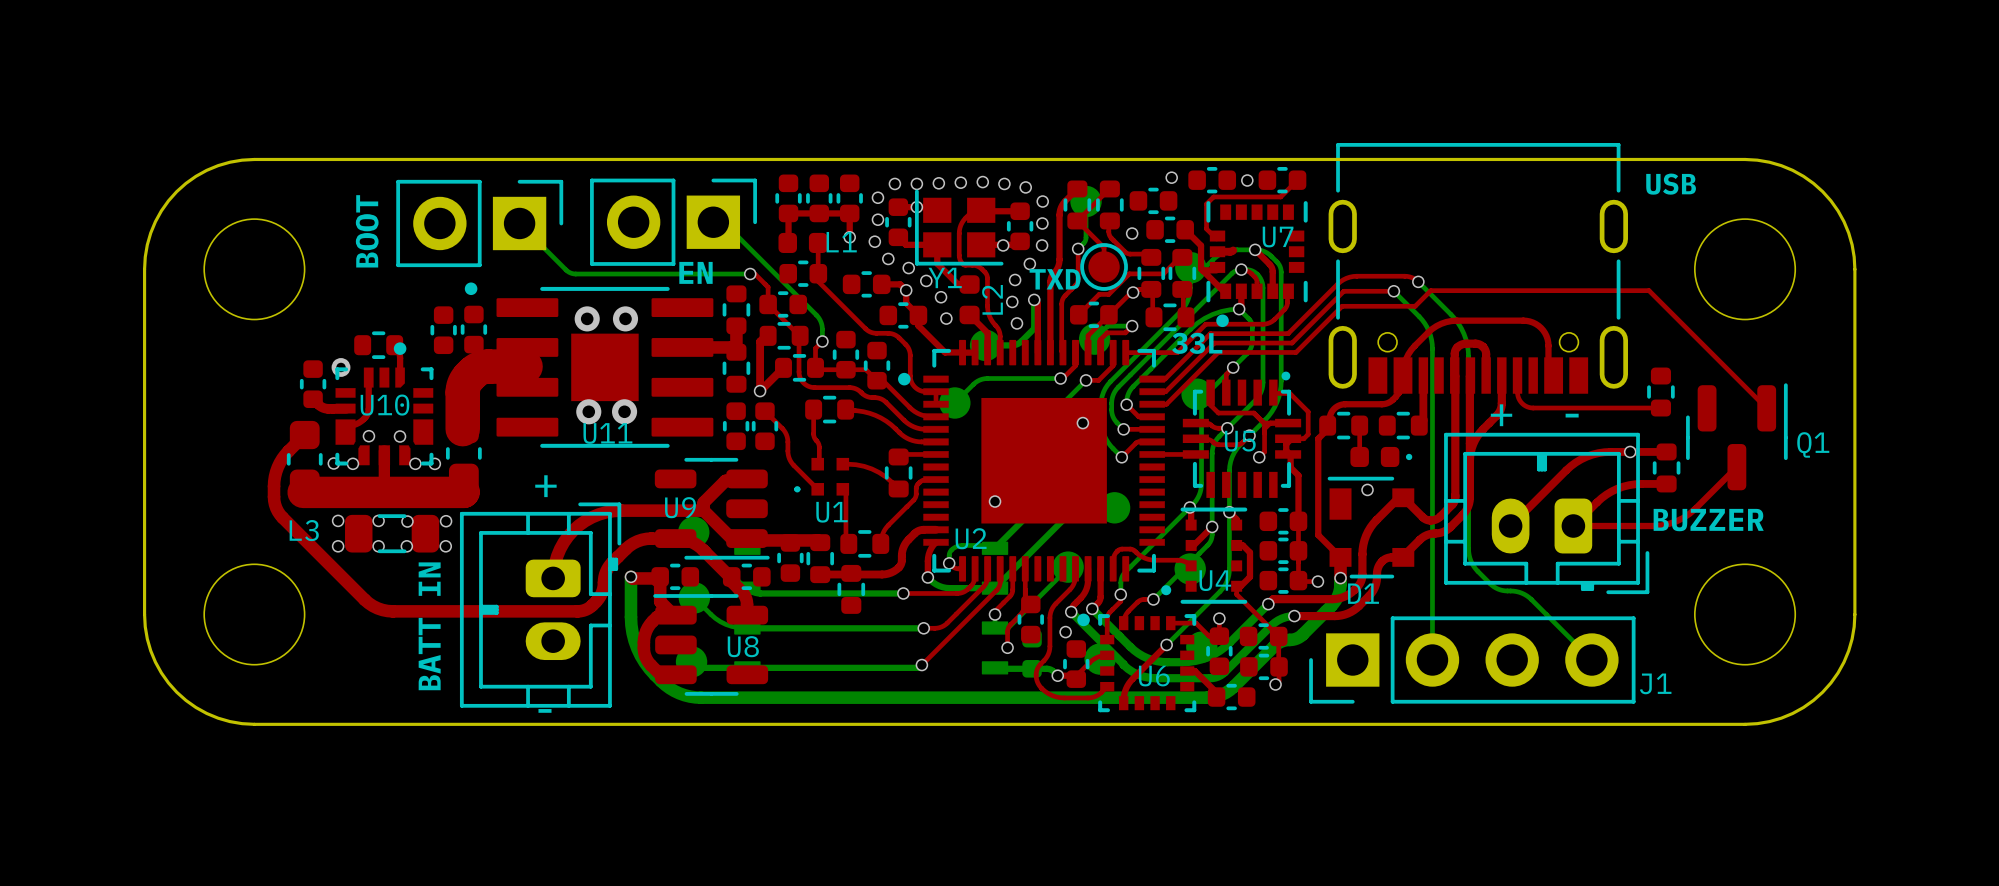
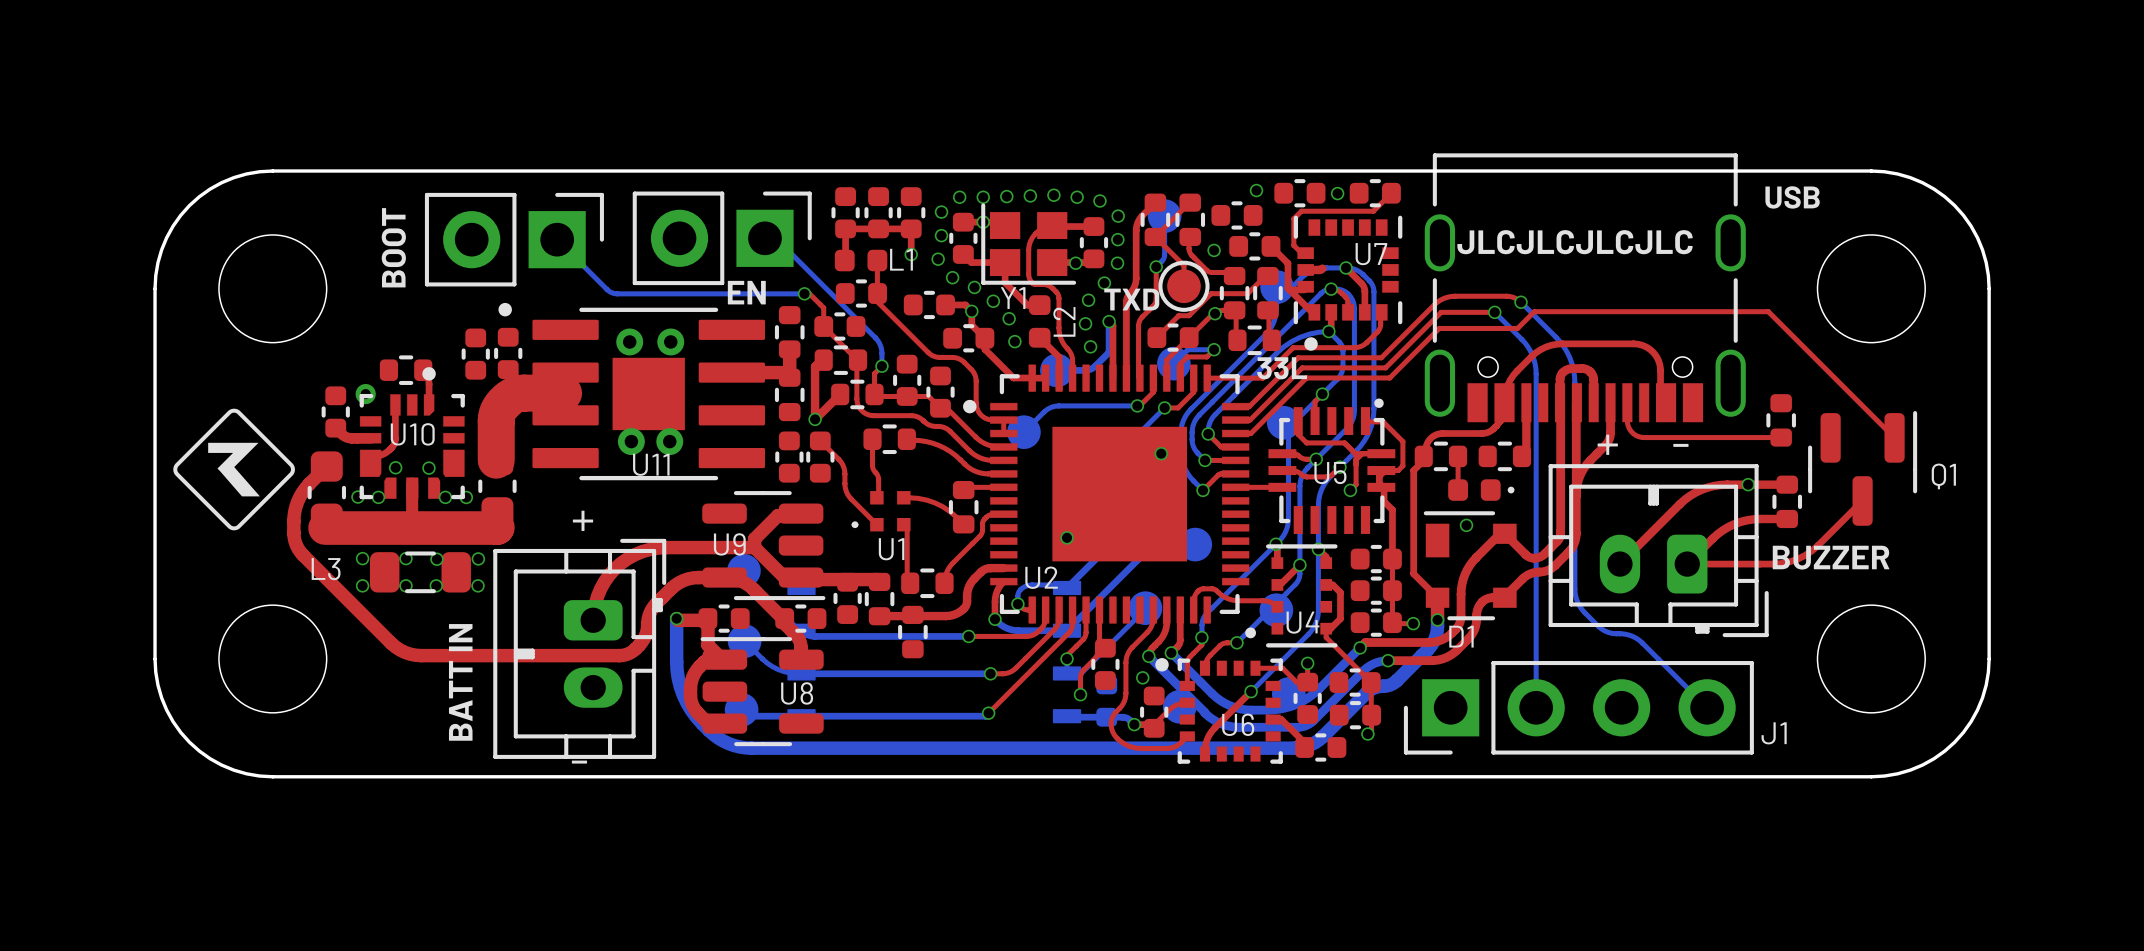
text: none -> JLCJLCJLCJLC (1575, 242)
drawing: none -> [173, 408, 295, 531]

